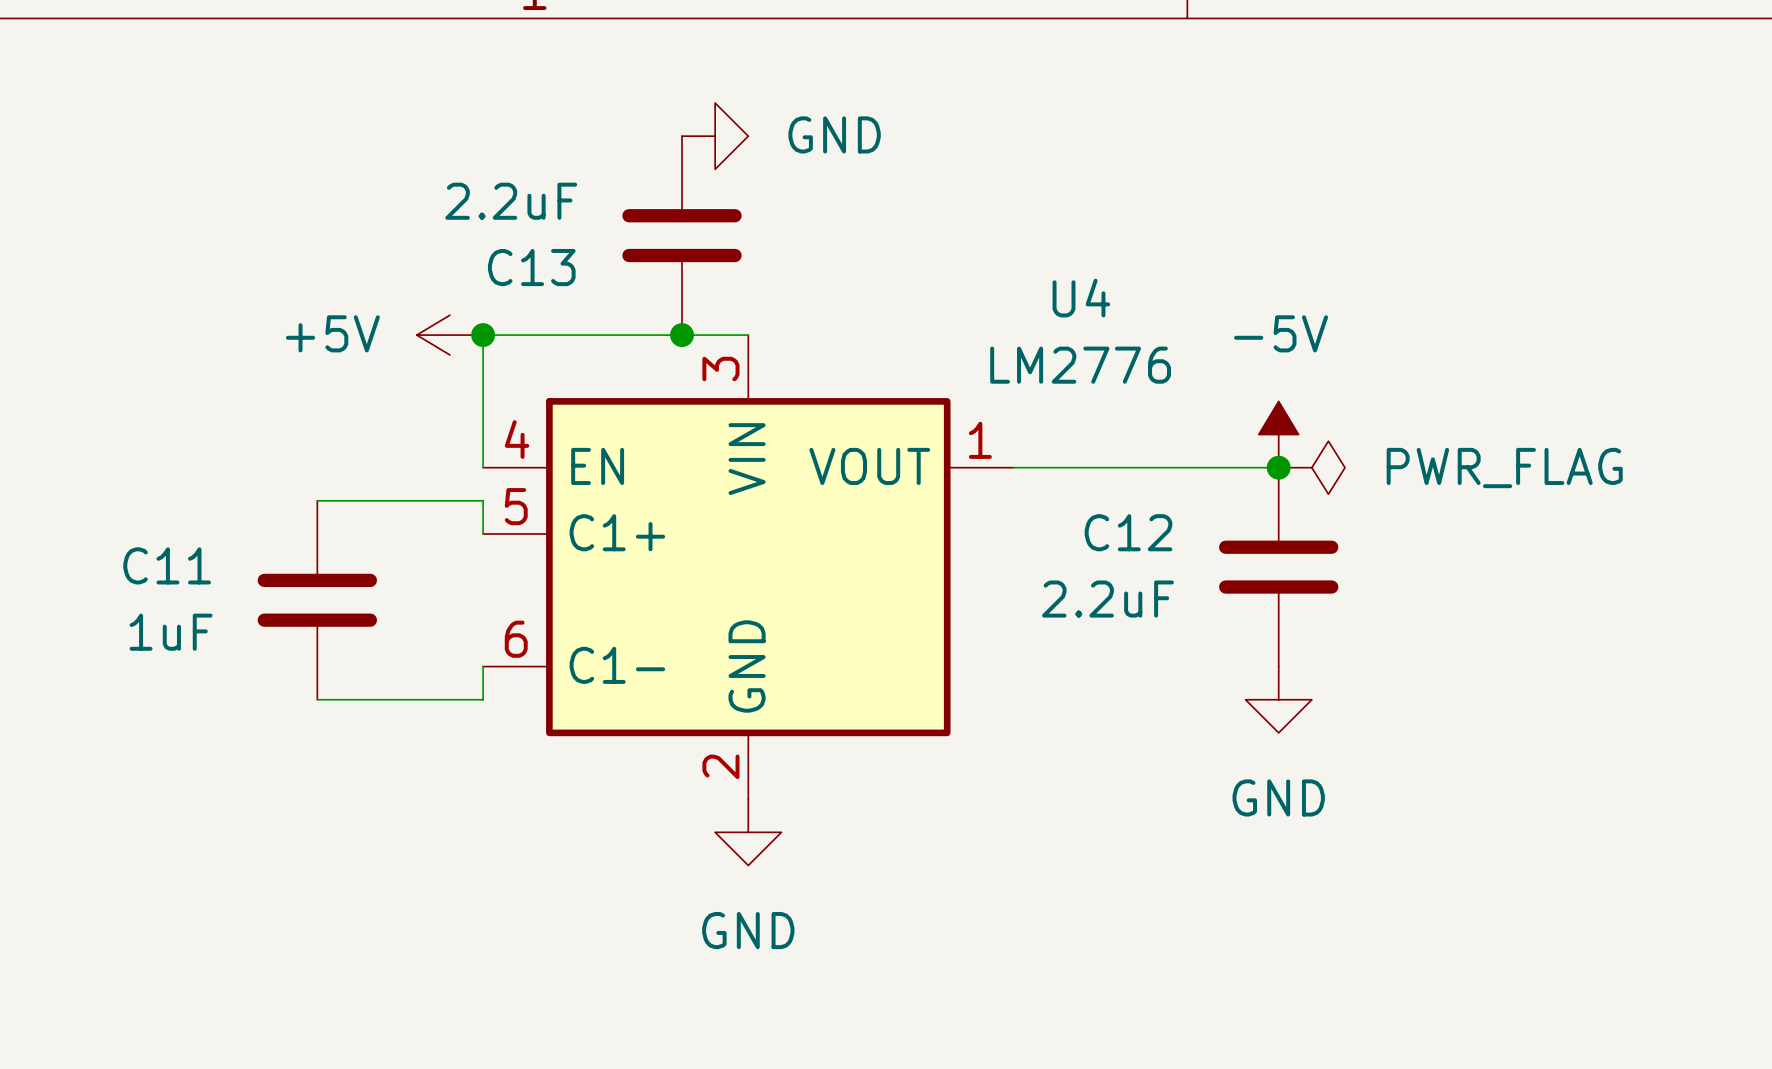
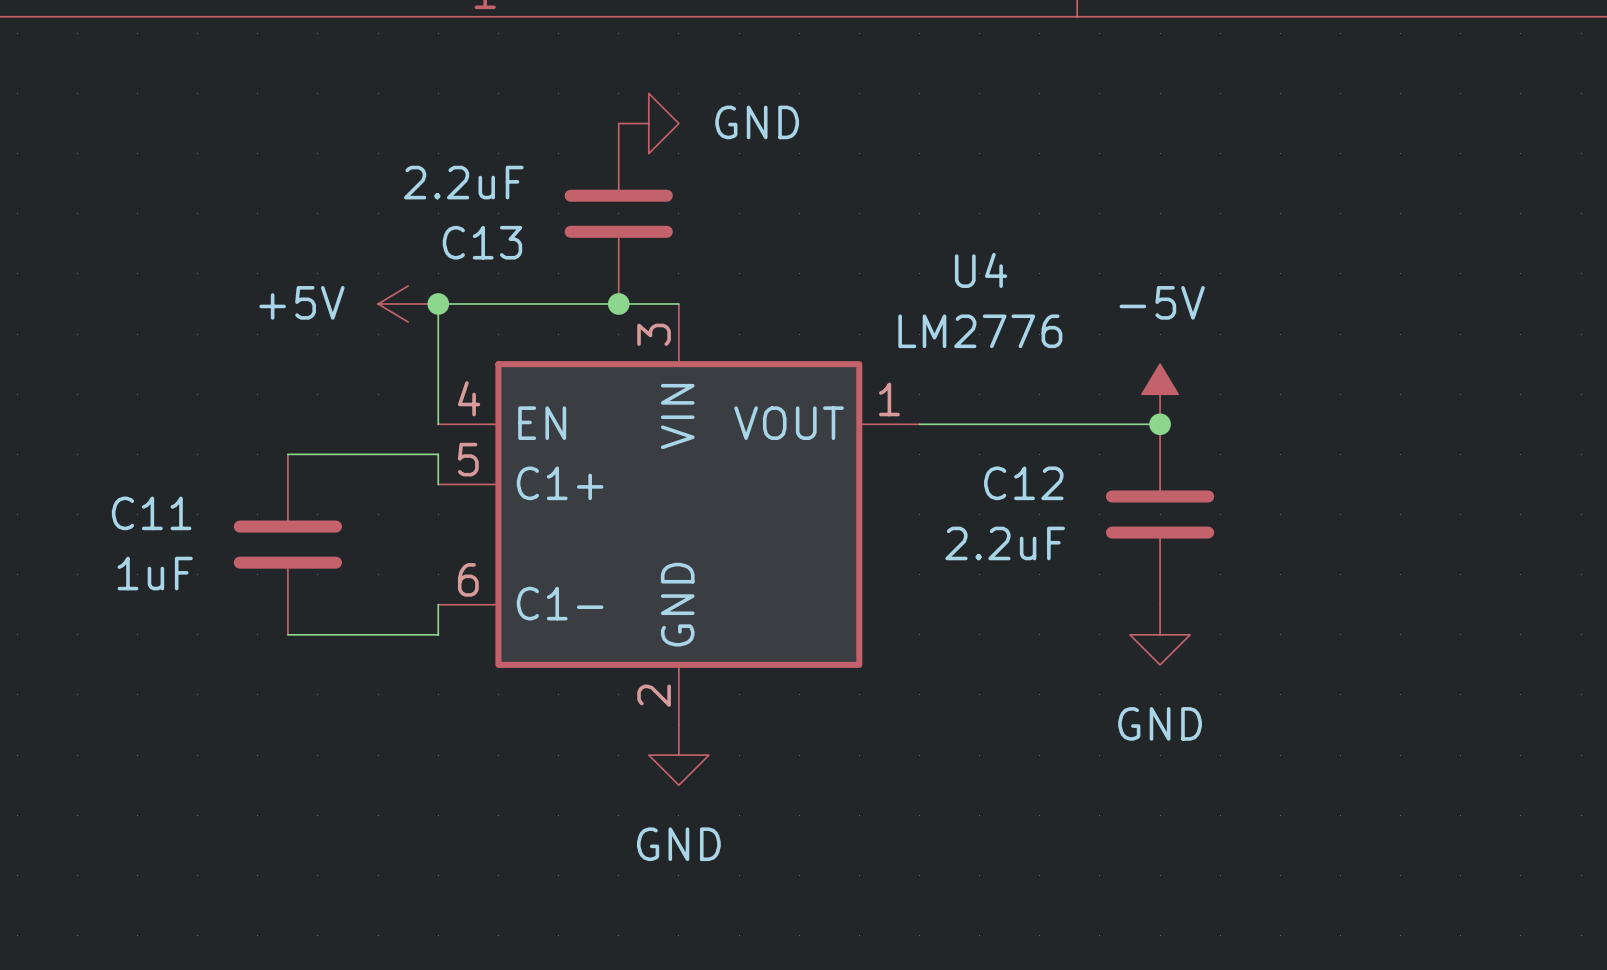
power symbol: PWR_FLAG (1311, 467) -> none

